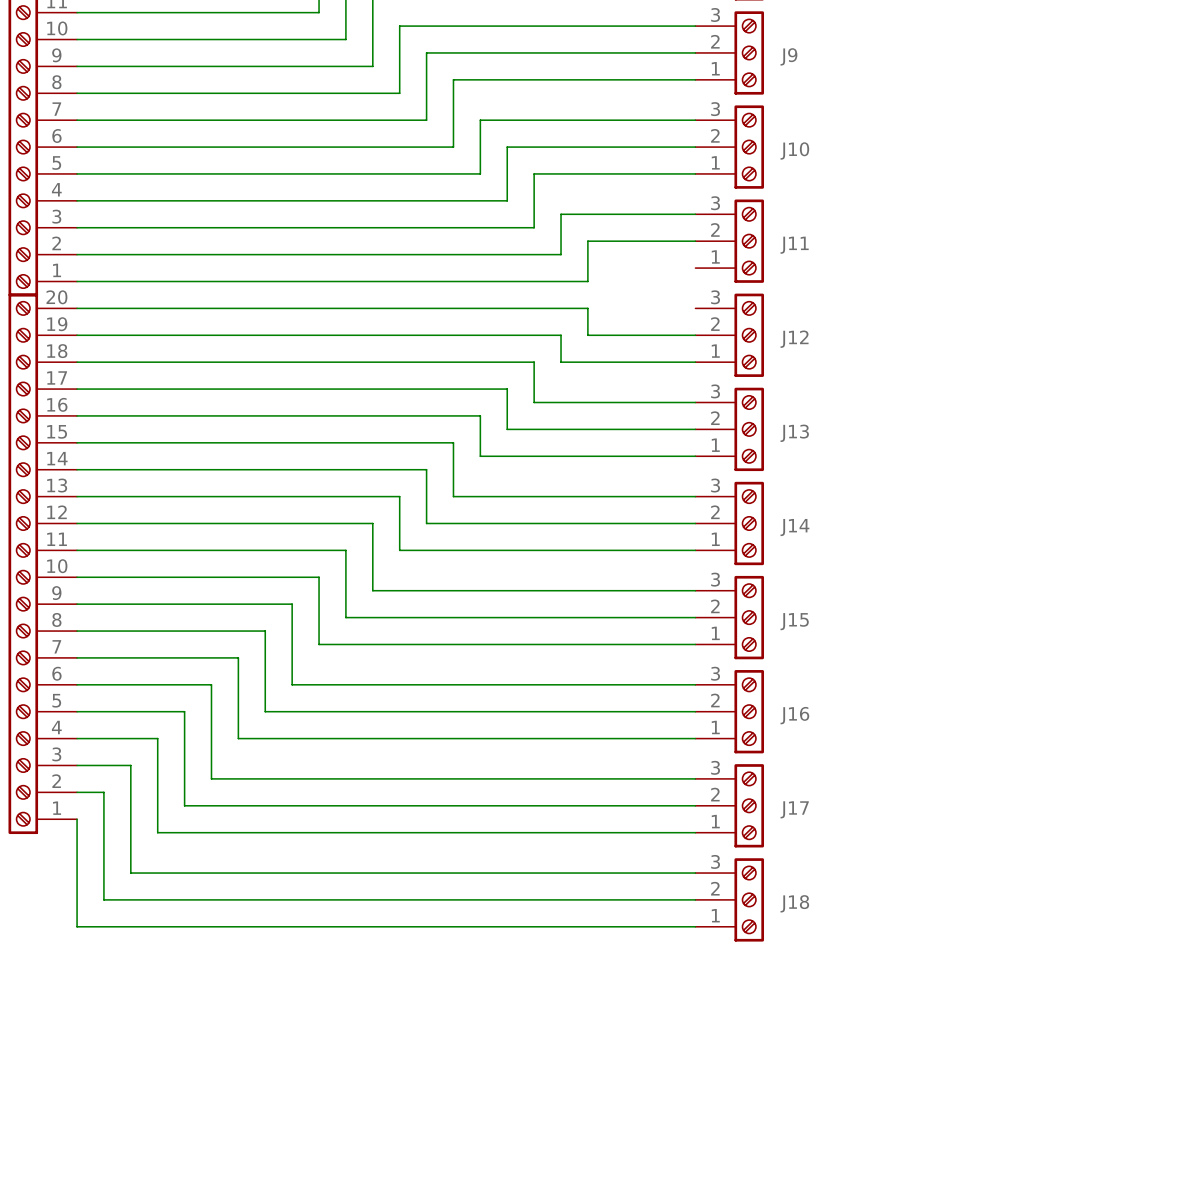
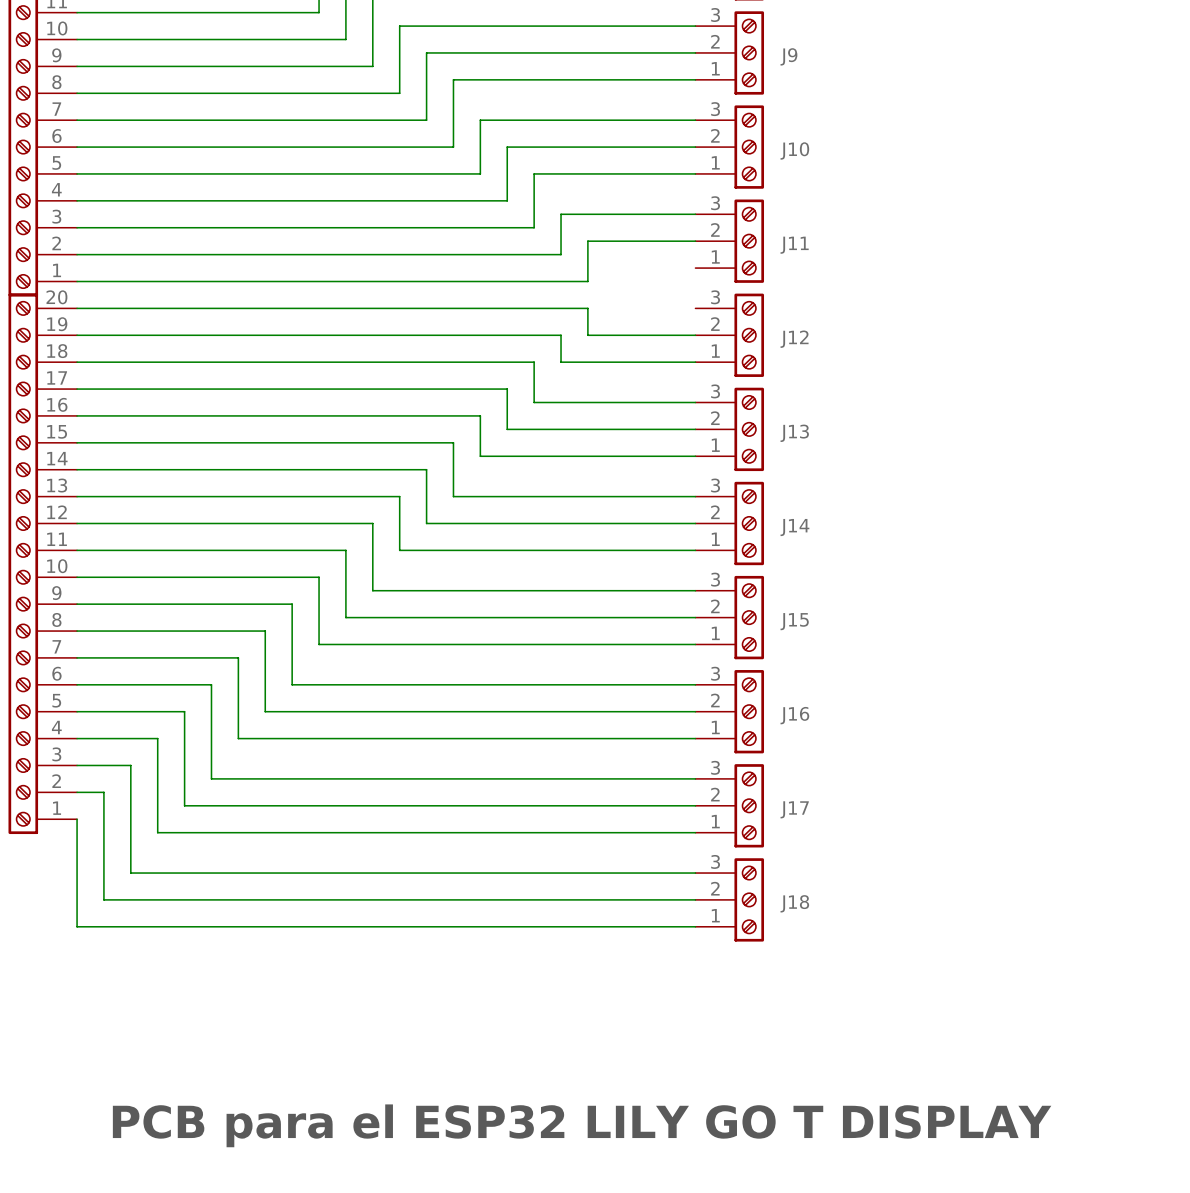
text: none -> PCB para el ESP32 LILY GO T DISPLAY (582, 1125)

